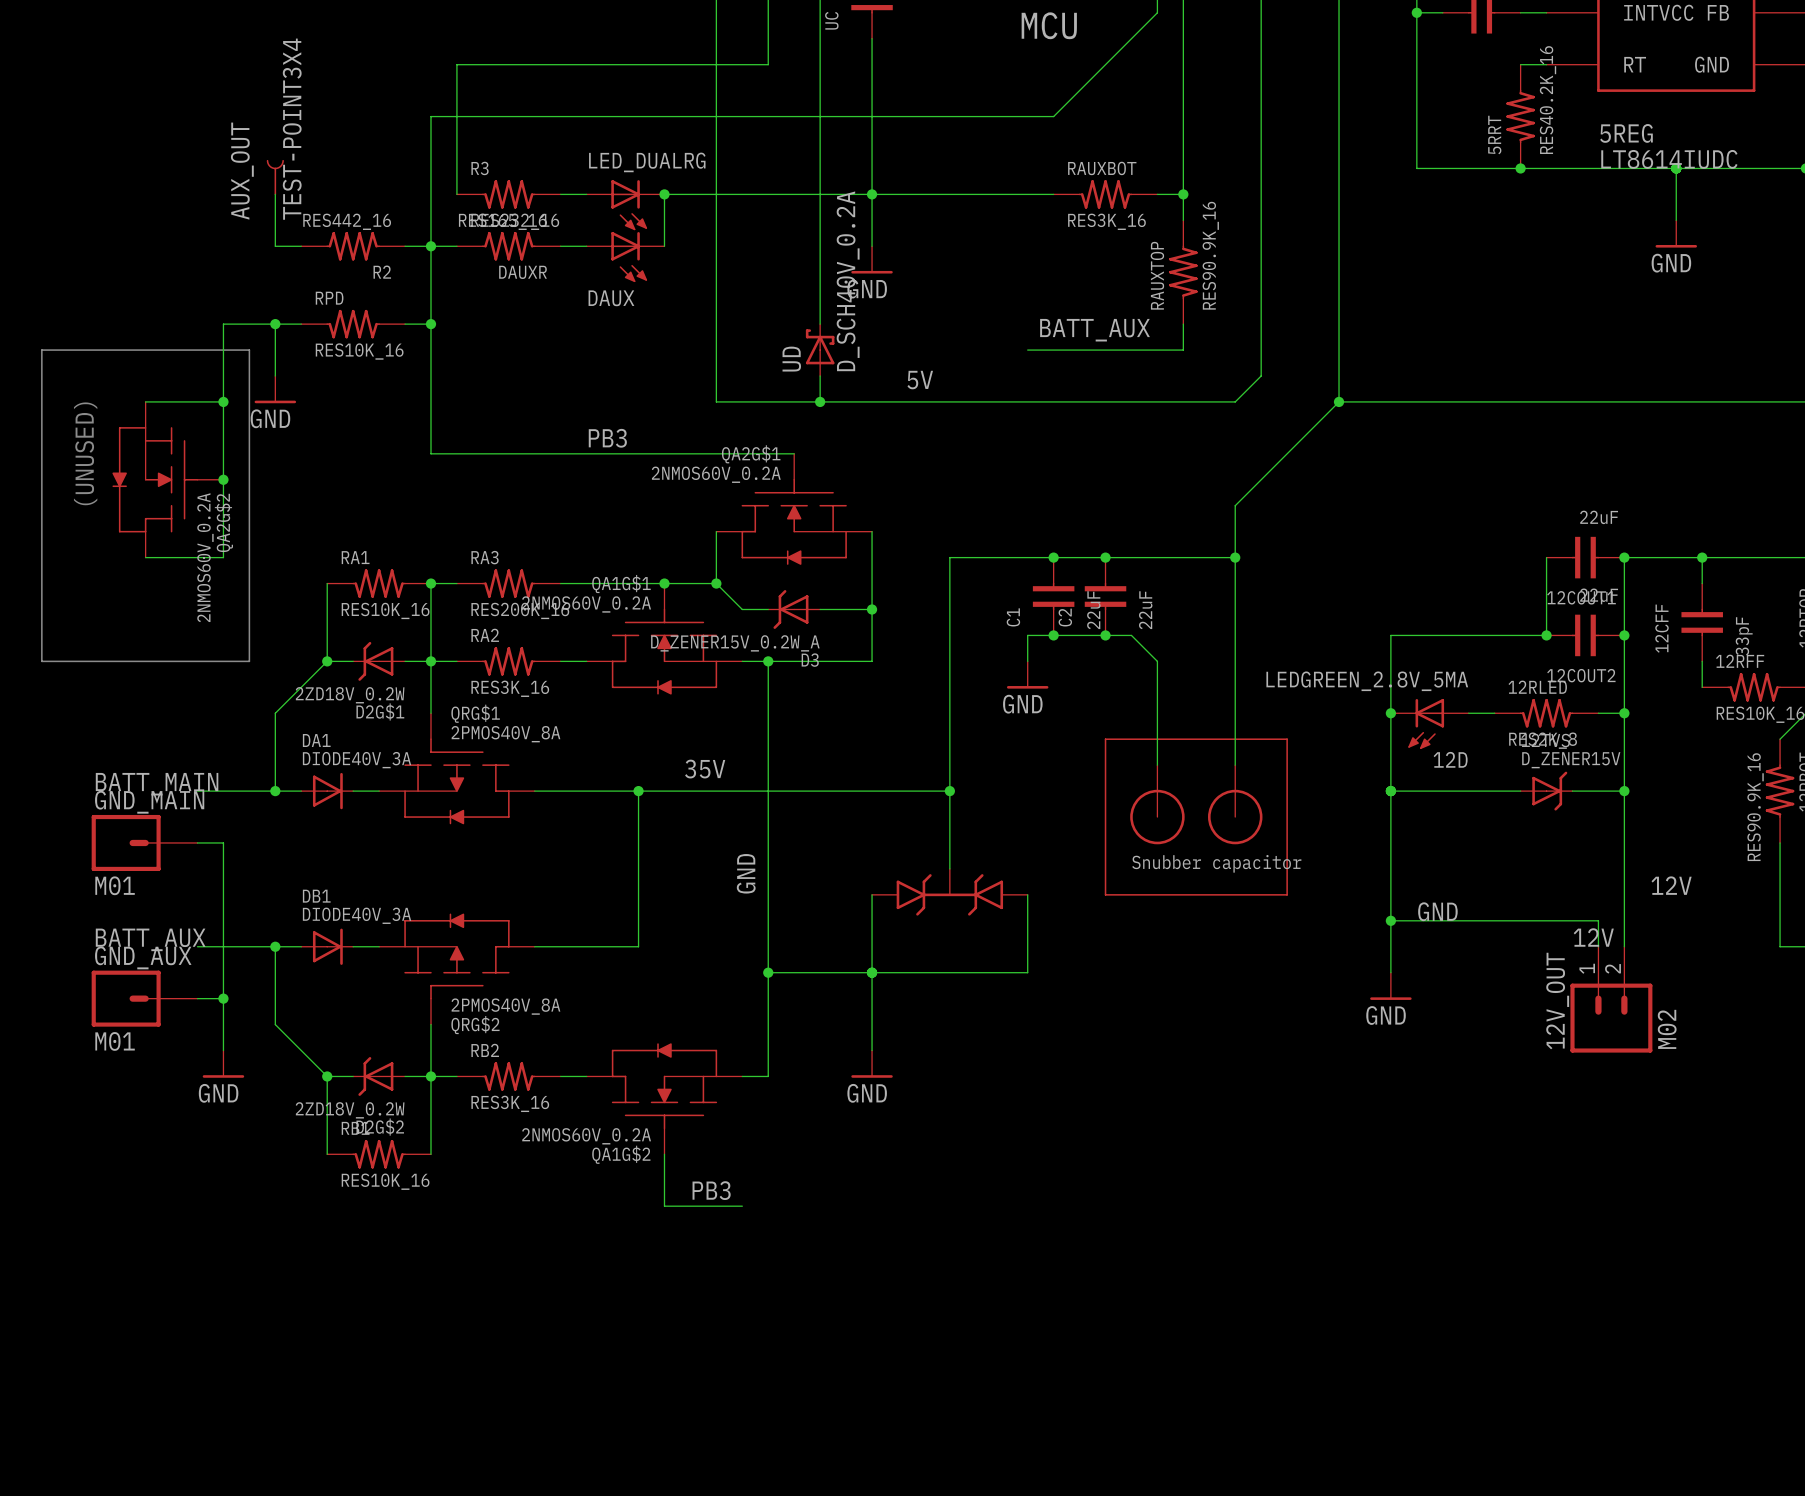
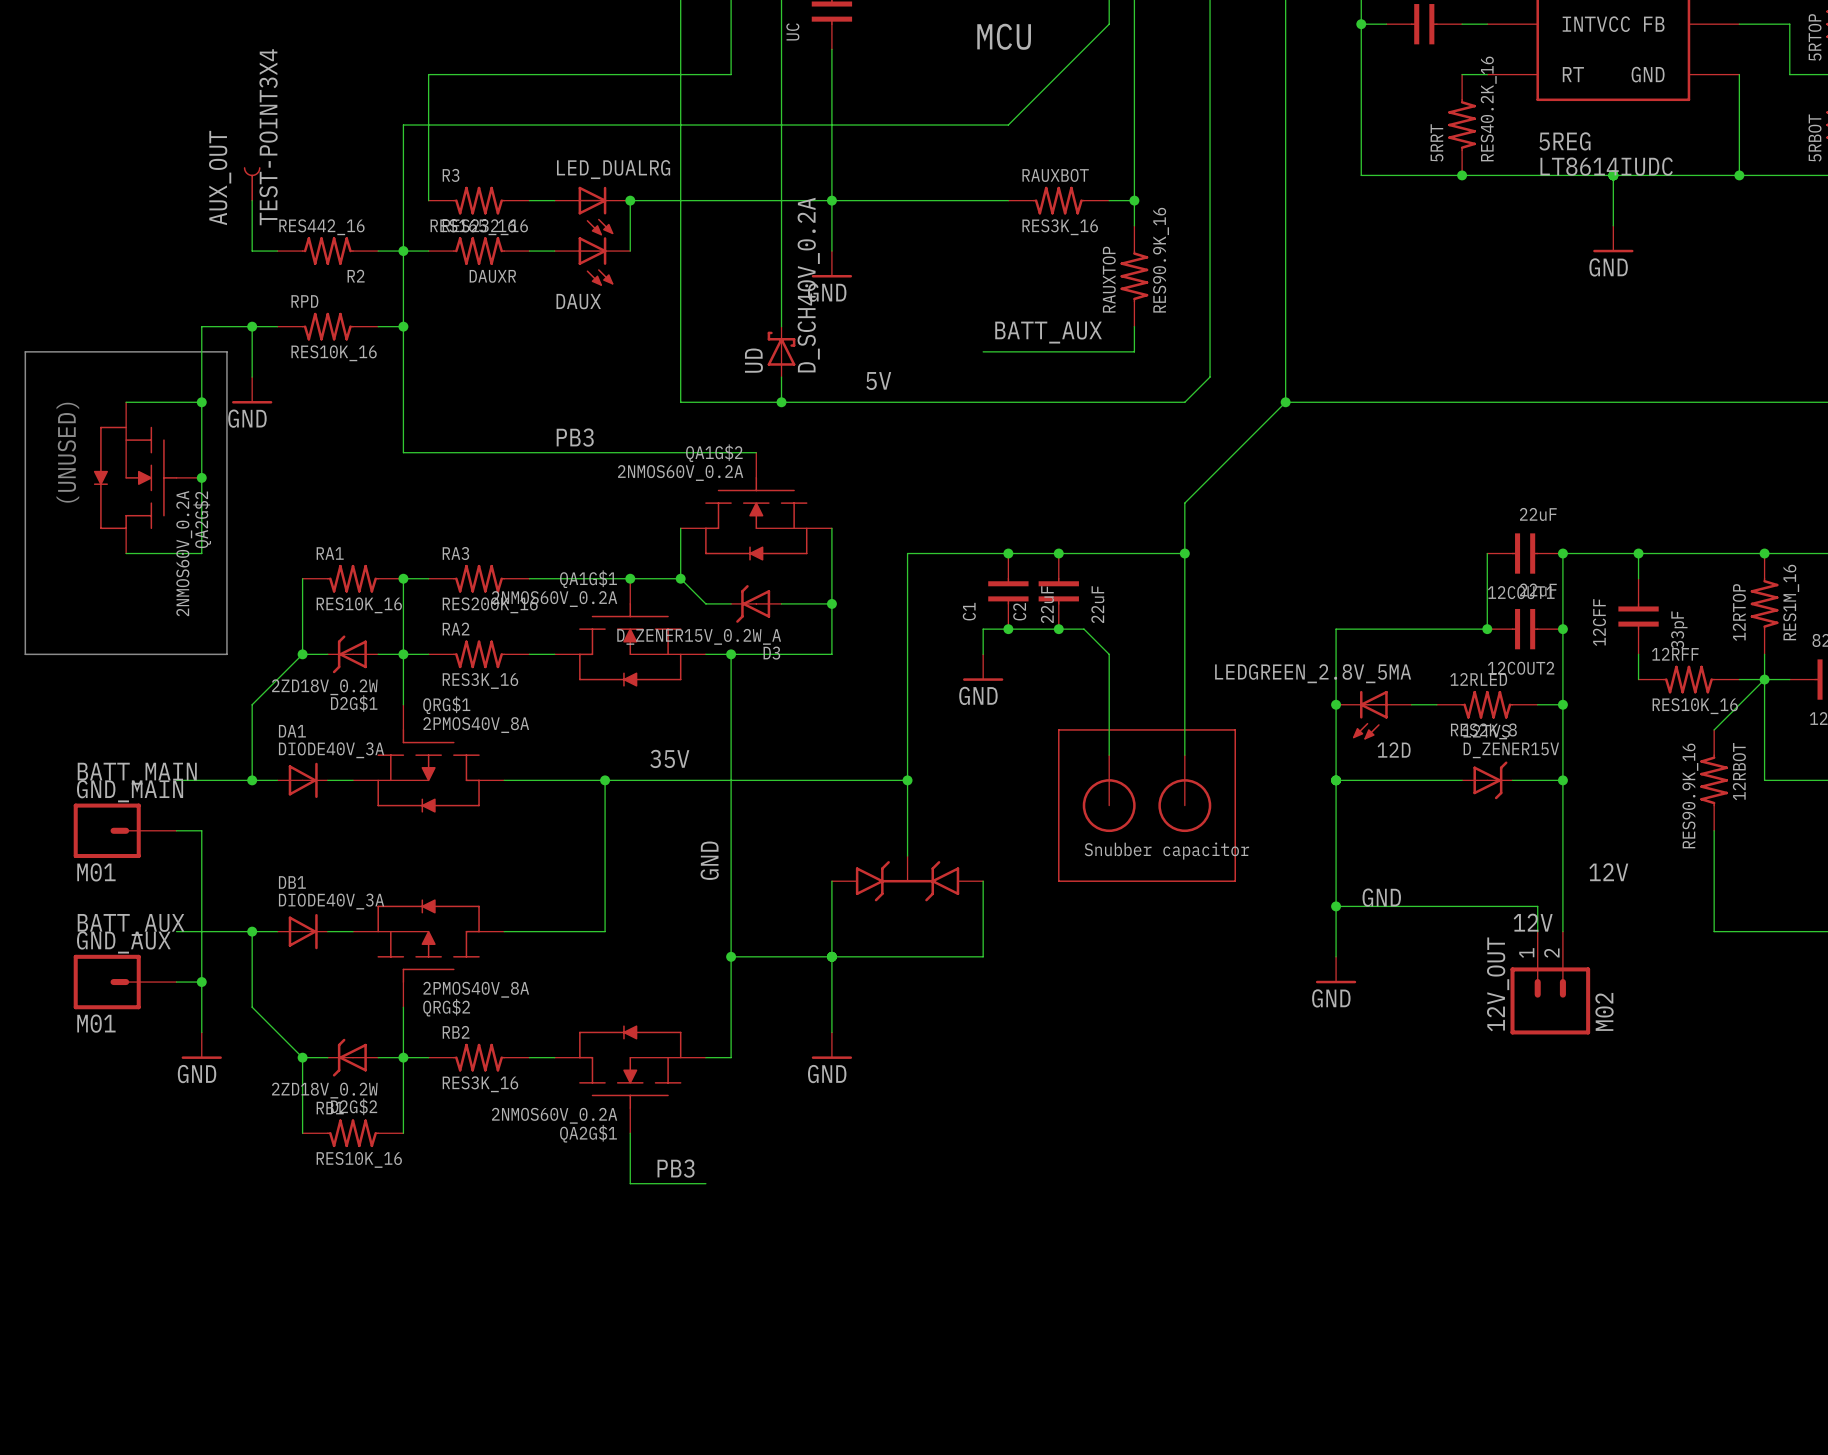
QA2G$1 name: QA2G$1 (751, 454) -> QA1G$2 (714, 453)
QA1G$2 name: QA1G$2 (621, 1154) -> QA2G$1 (588, 1133)

